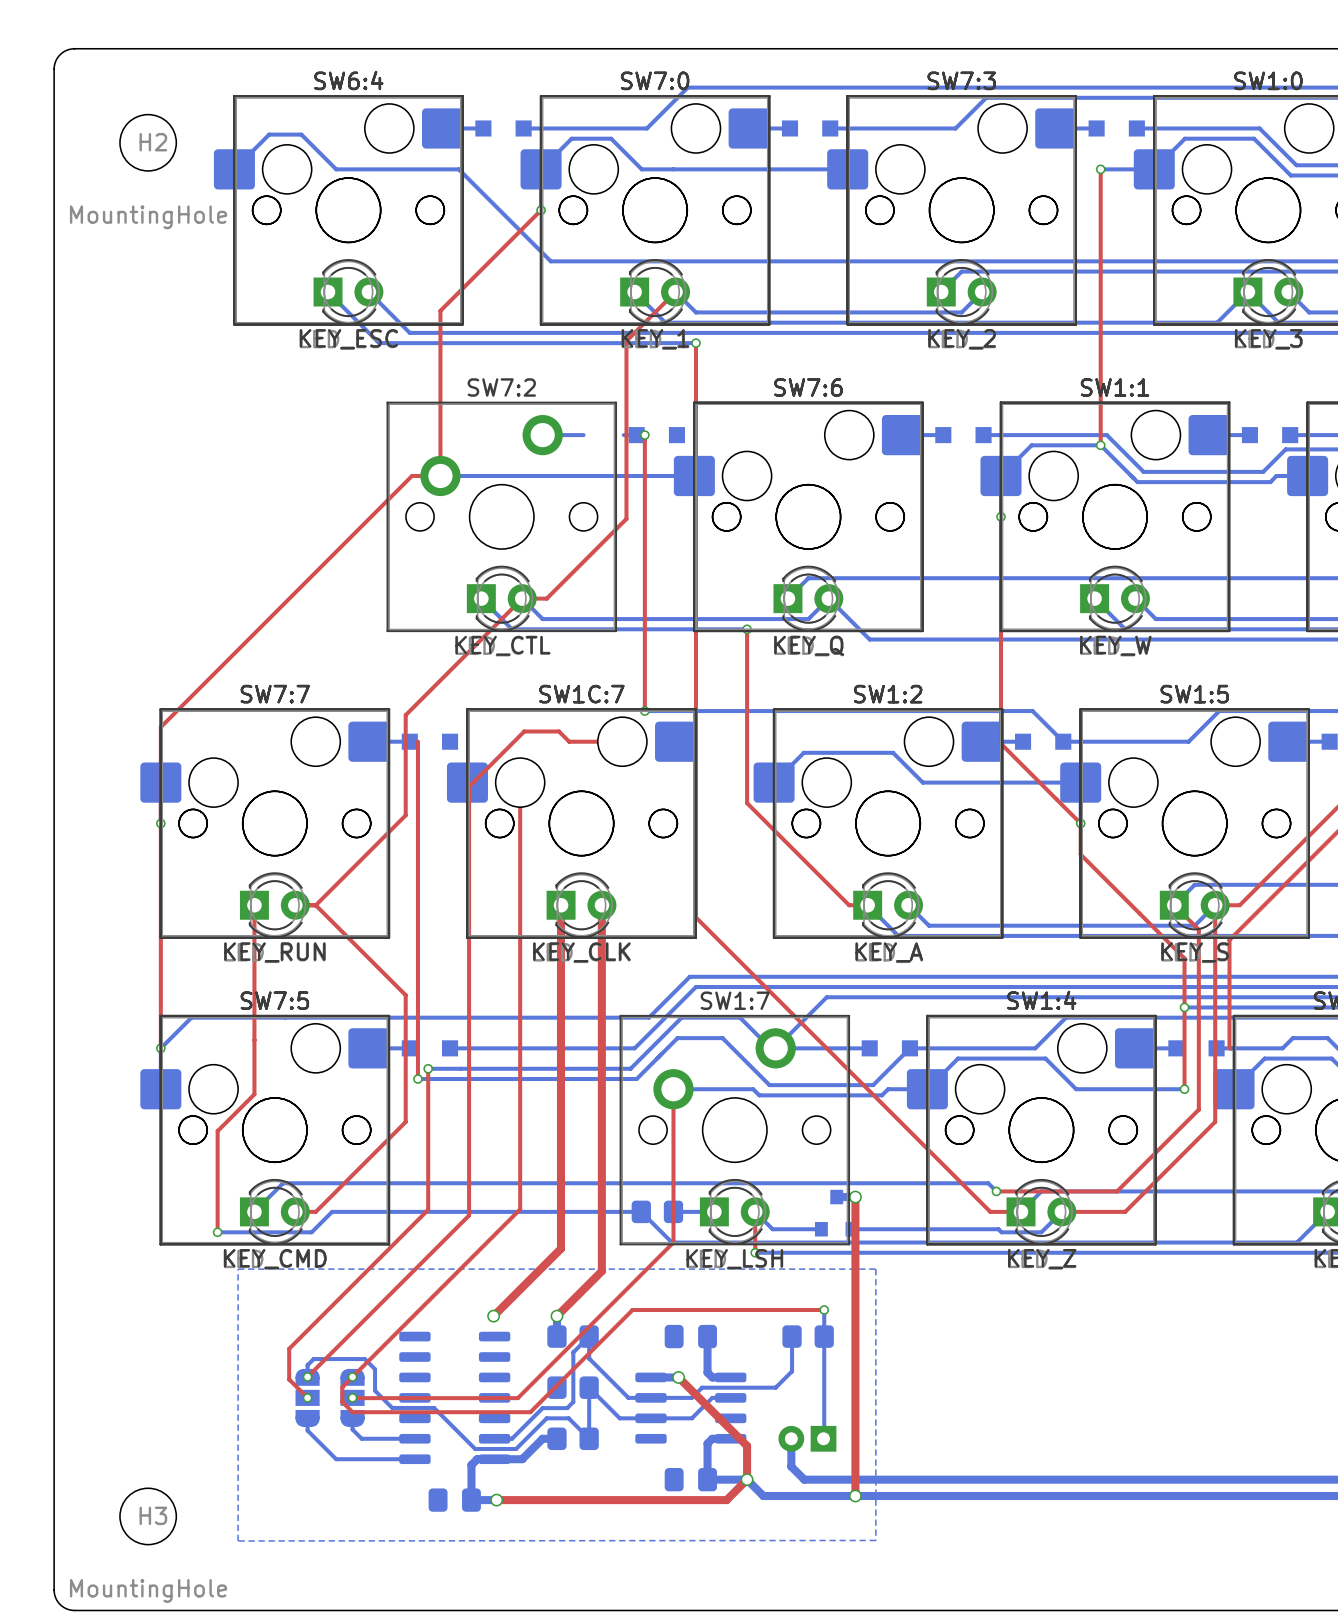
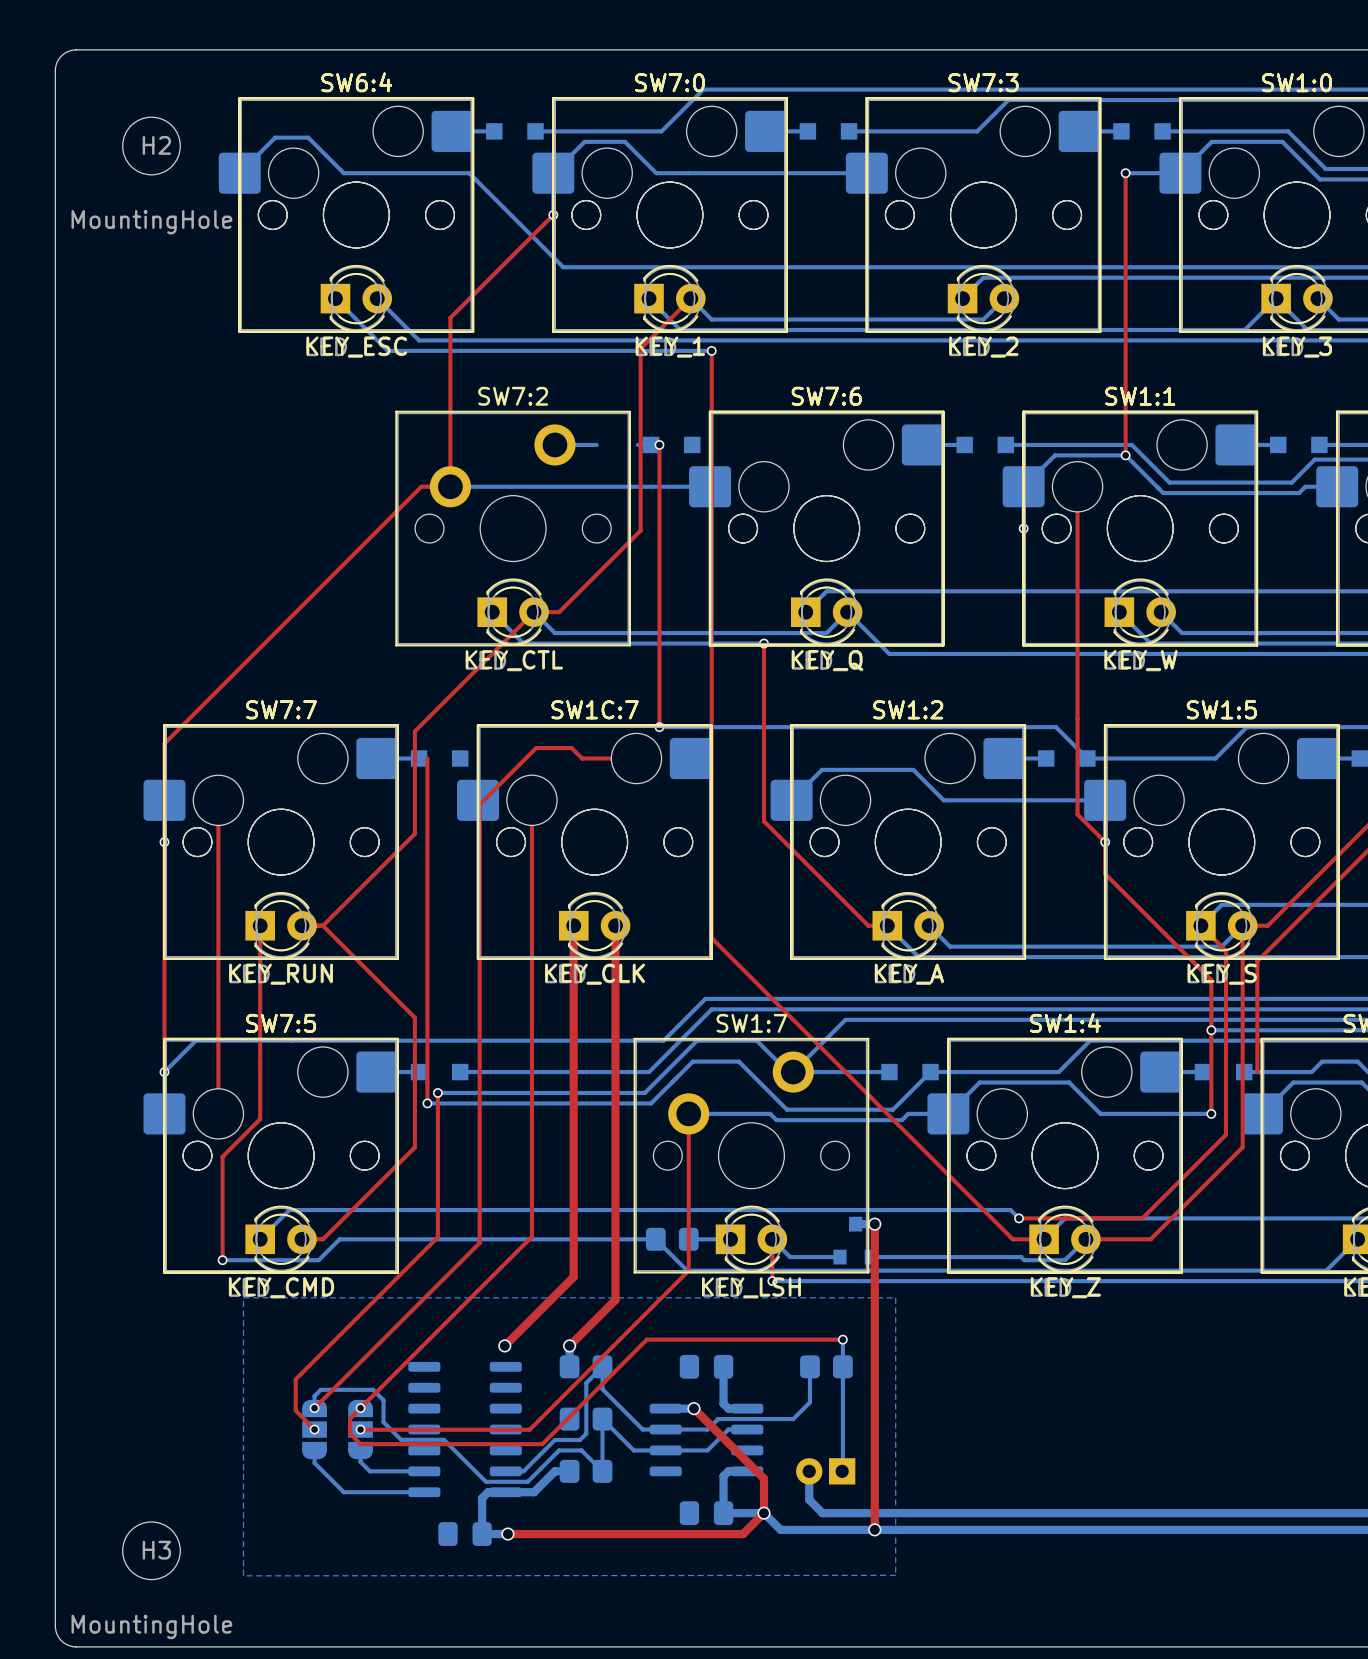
top track: (1000, 516) (1000, 743) (1053, 796) -> (1077, 486) (1077, 814)
top track: none -> (218, 800) (218, 1113)

